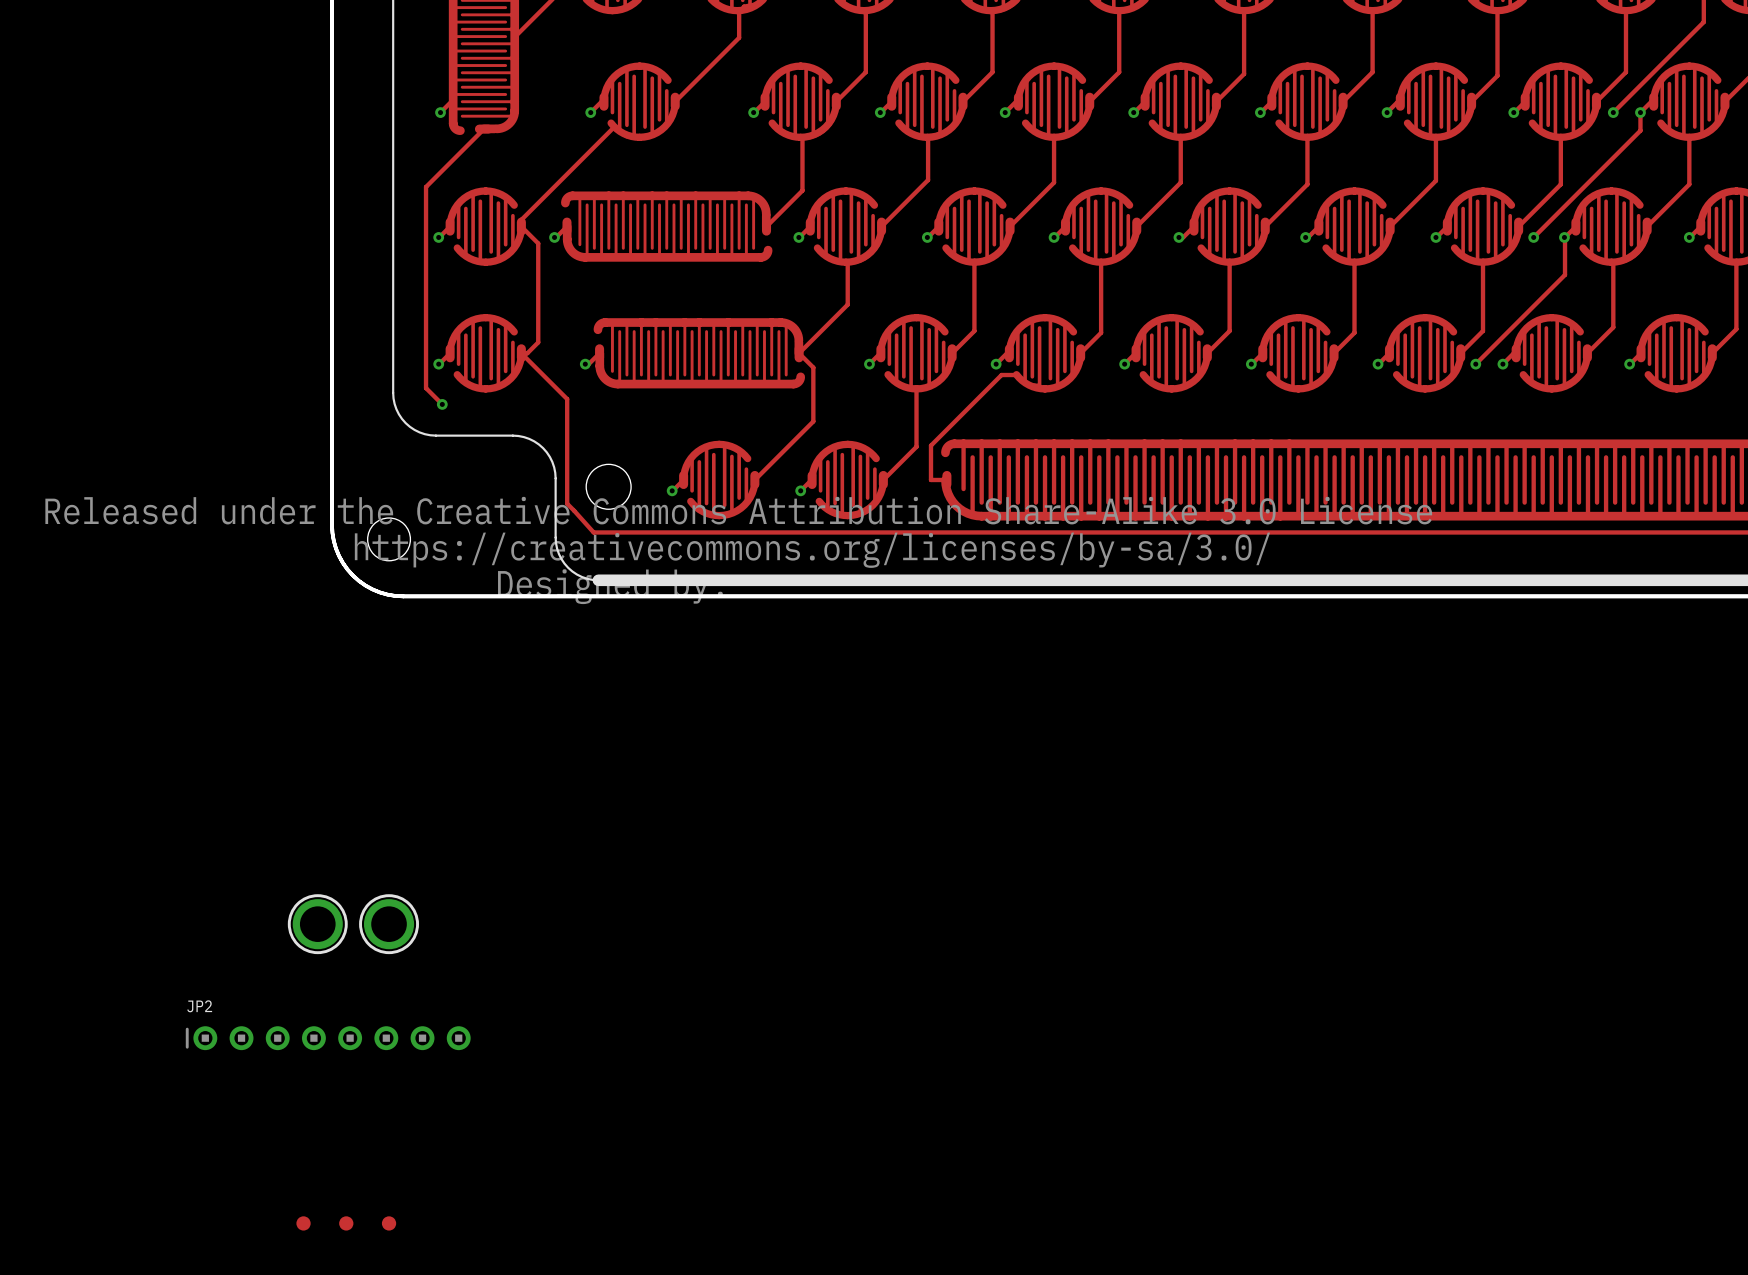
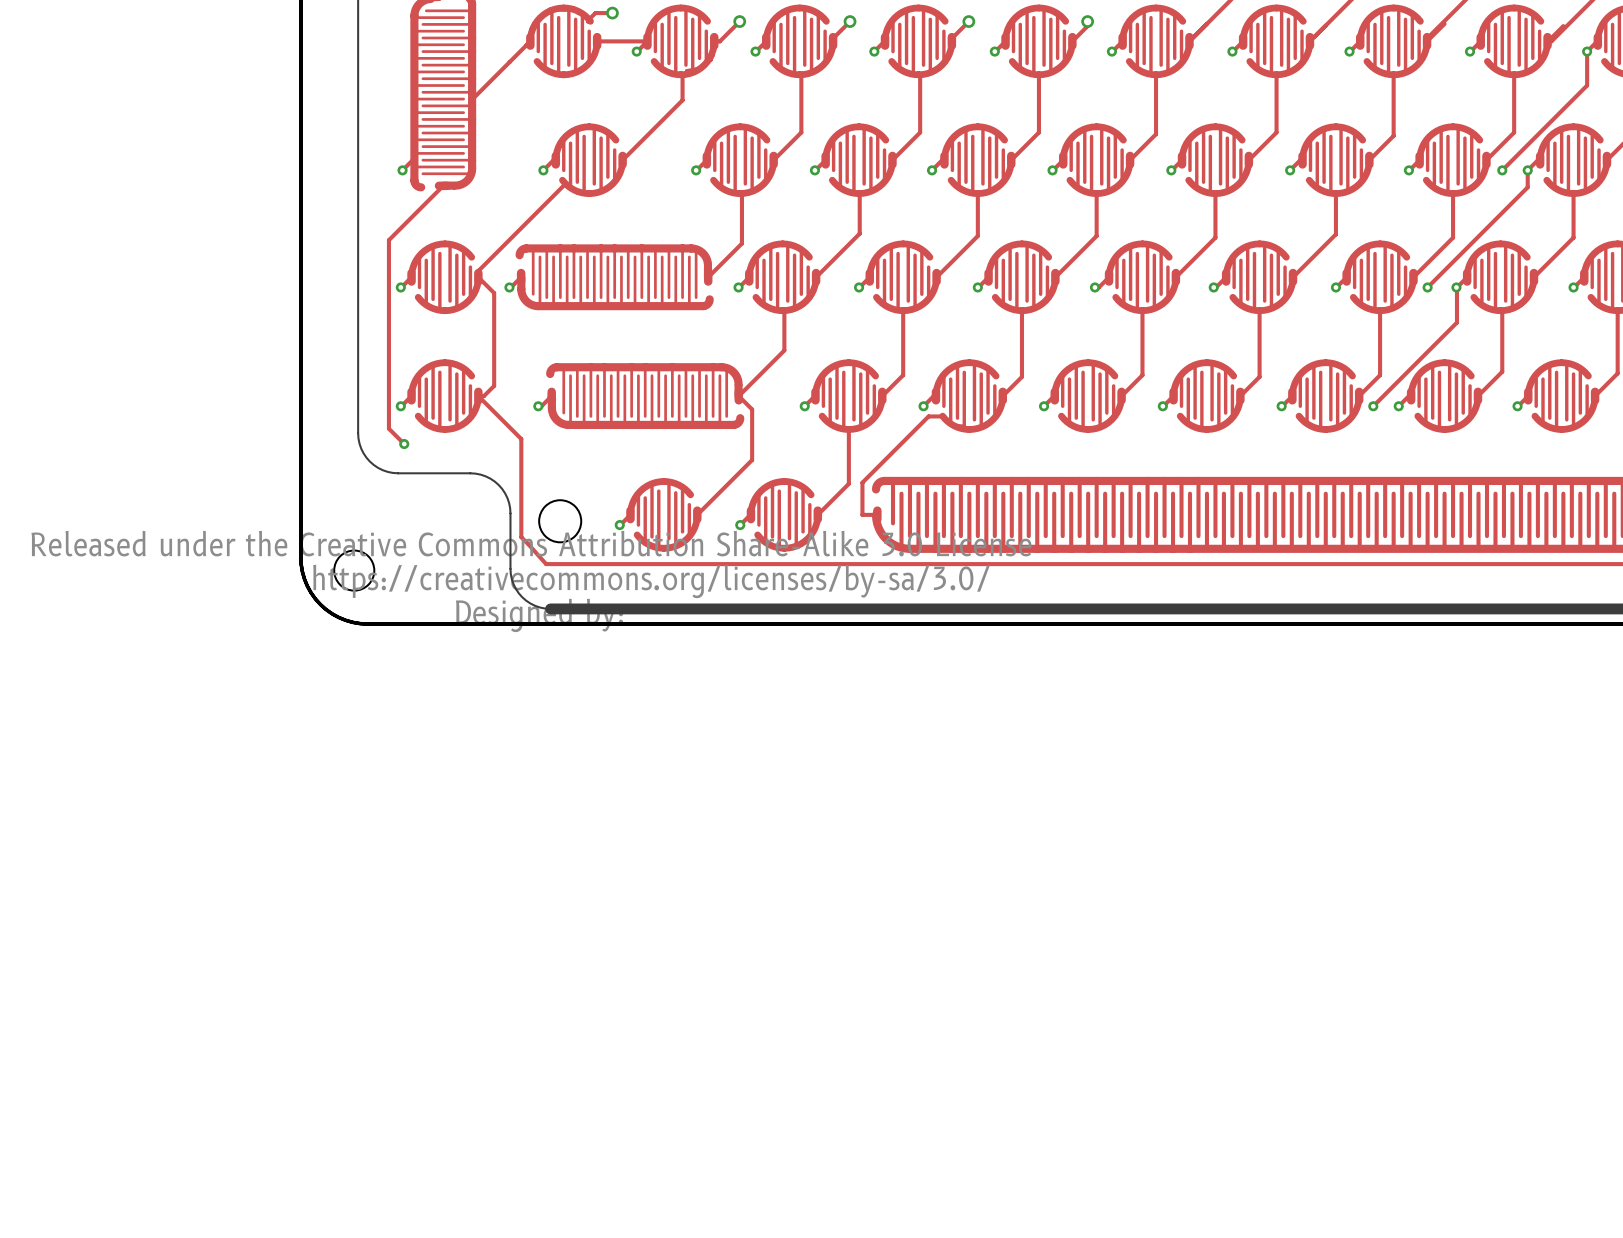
part: (317, 924) -> none
part: (389, 924) -> none
JP2: (328, 1038) -> none
part: (303, 1223) -> none
part: (346, 1223) -> none
part: (389, 1223) -> none

